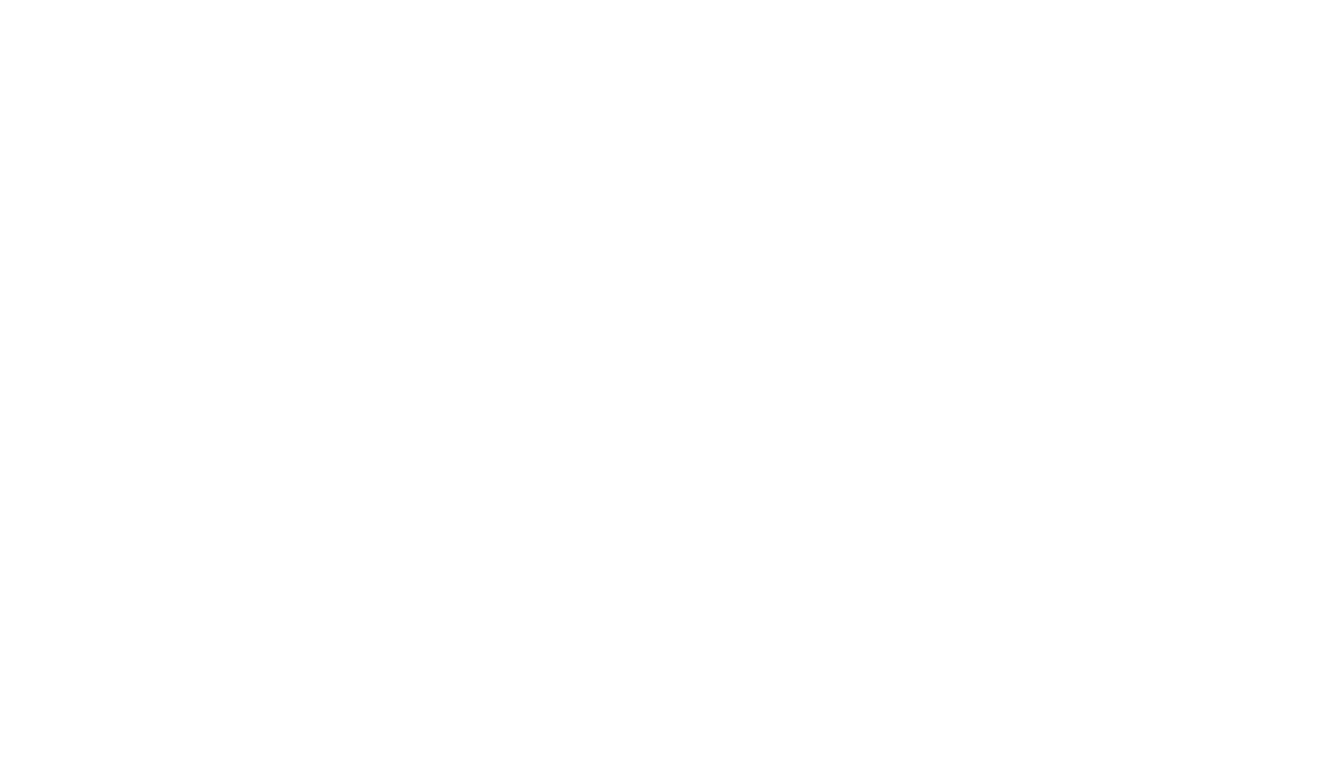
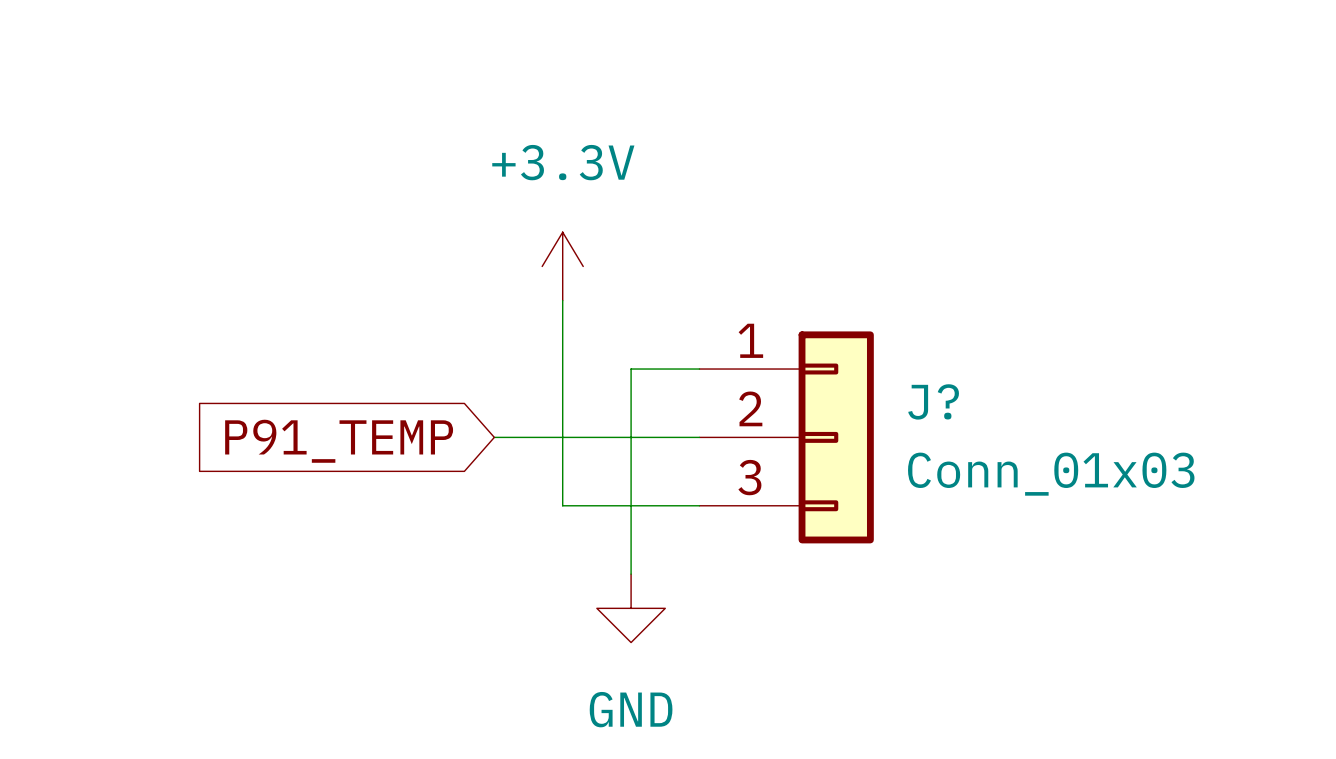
power symbol: none -> +3.3V (562, 266)
wire: none -> (562, 300) (562, 505) (699, 505)
wire: none -> (699, 369) (631, 369) (631, 574)
wire: none -> (494, 437) (699, 437)
J?: none -> Conn_01x03 (786, 437)
global label: none -> P91_TEMP (339, 441)
power symbol: none -> GND (631, 608)

